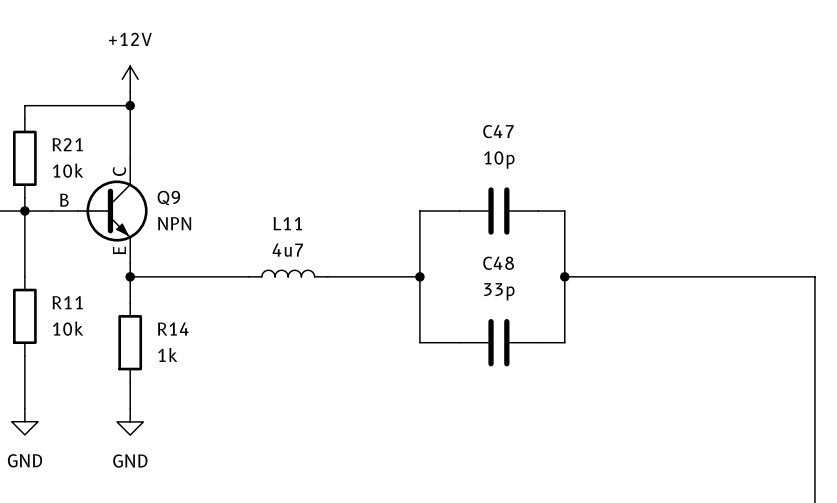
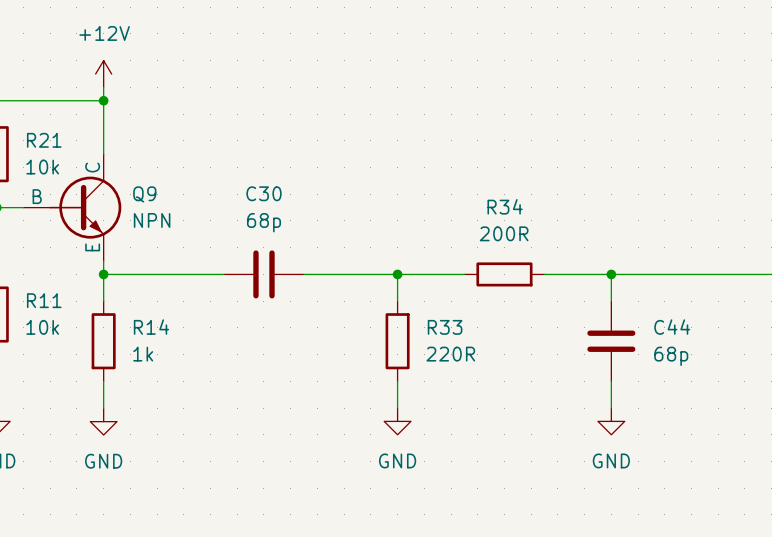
wire: (459, 211) (419, 211) (419, 276) -> (464, 274) (397, 274)
C47: 10p (498, 211) -> none
wire: (538, 211) (564, 211) (564, 342) (538, 342) -> none
L11: 4u7 (288, 273) -> none
C30: none -> 68p (263, 274)
R34: none -> 200R (504, 274)
junction: (564, 276) -> none
wire: none -> (611, 274) (611, 301)
junction: none -> (611, 274)
wire: (419, 303) (419, 342) (459, 342) -> none
R33: none -> 220R (397, 341)
C48: 33p (498, 342) -> none
C44: none -> 68p (611, 341)
wire: none -> (397, 381) (397, 408)
wire: none -> (611, 381) (611, 408)
power symbol: none -> GND (397, 421)
power symbol: none -> GND (611, 421)

